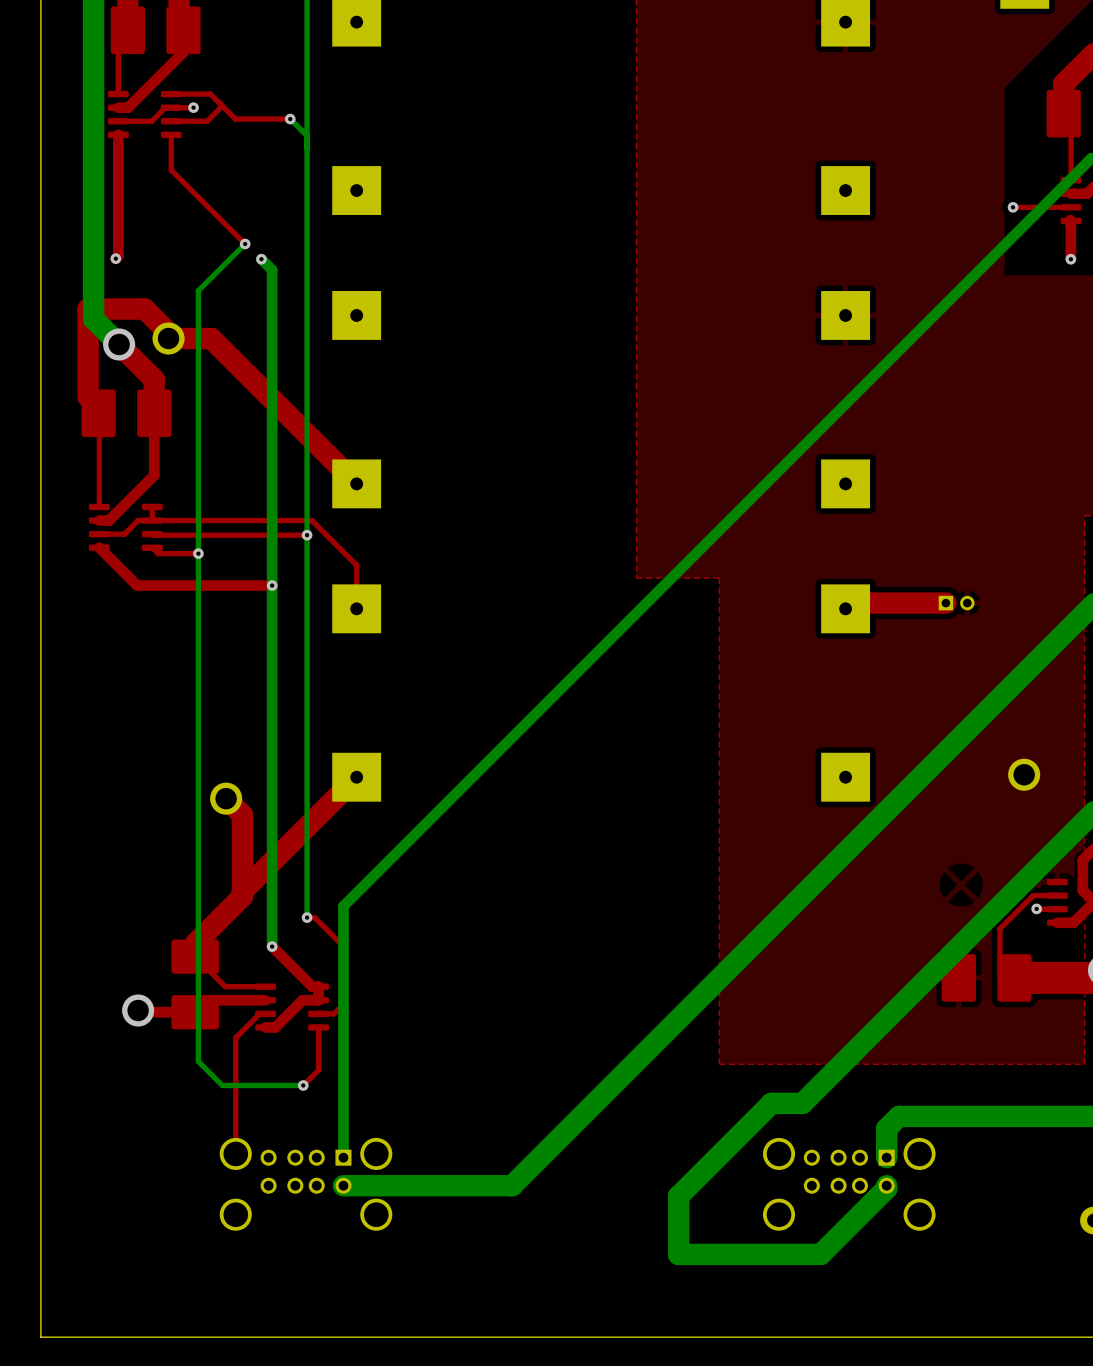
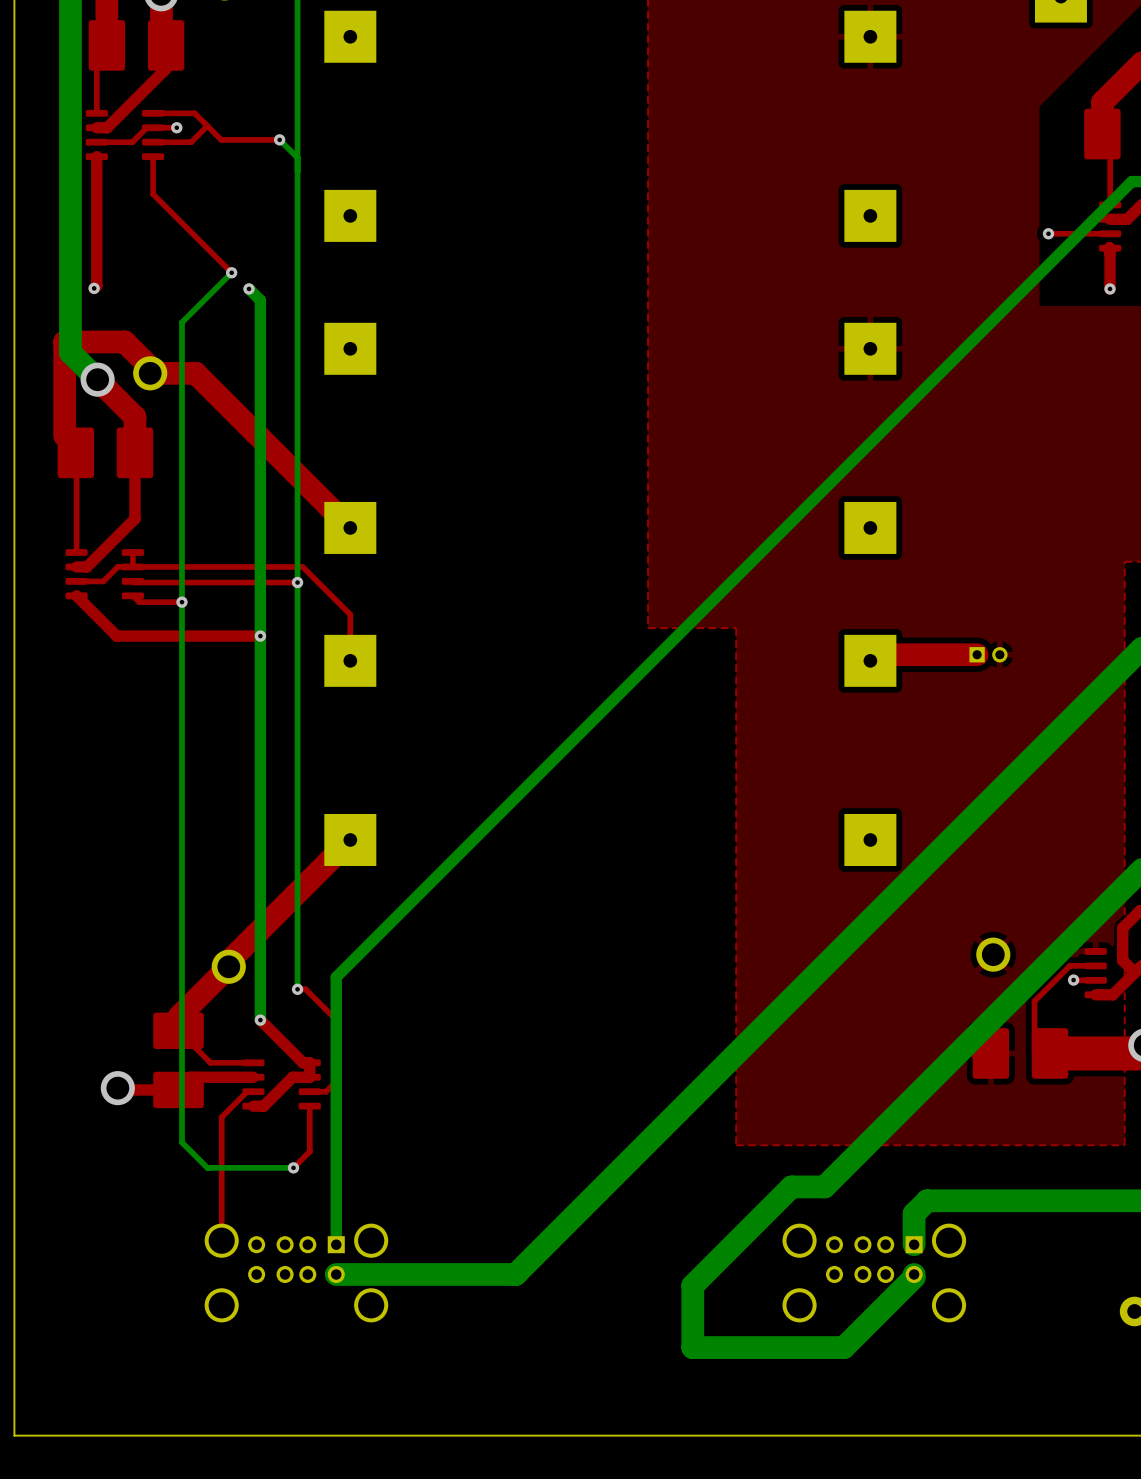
part position: (1024, 774) -> (993, 954)
top track: (226, 798) (242, 814) (242, 891) -> none
part position: (226, 798) -> (228, 966)

